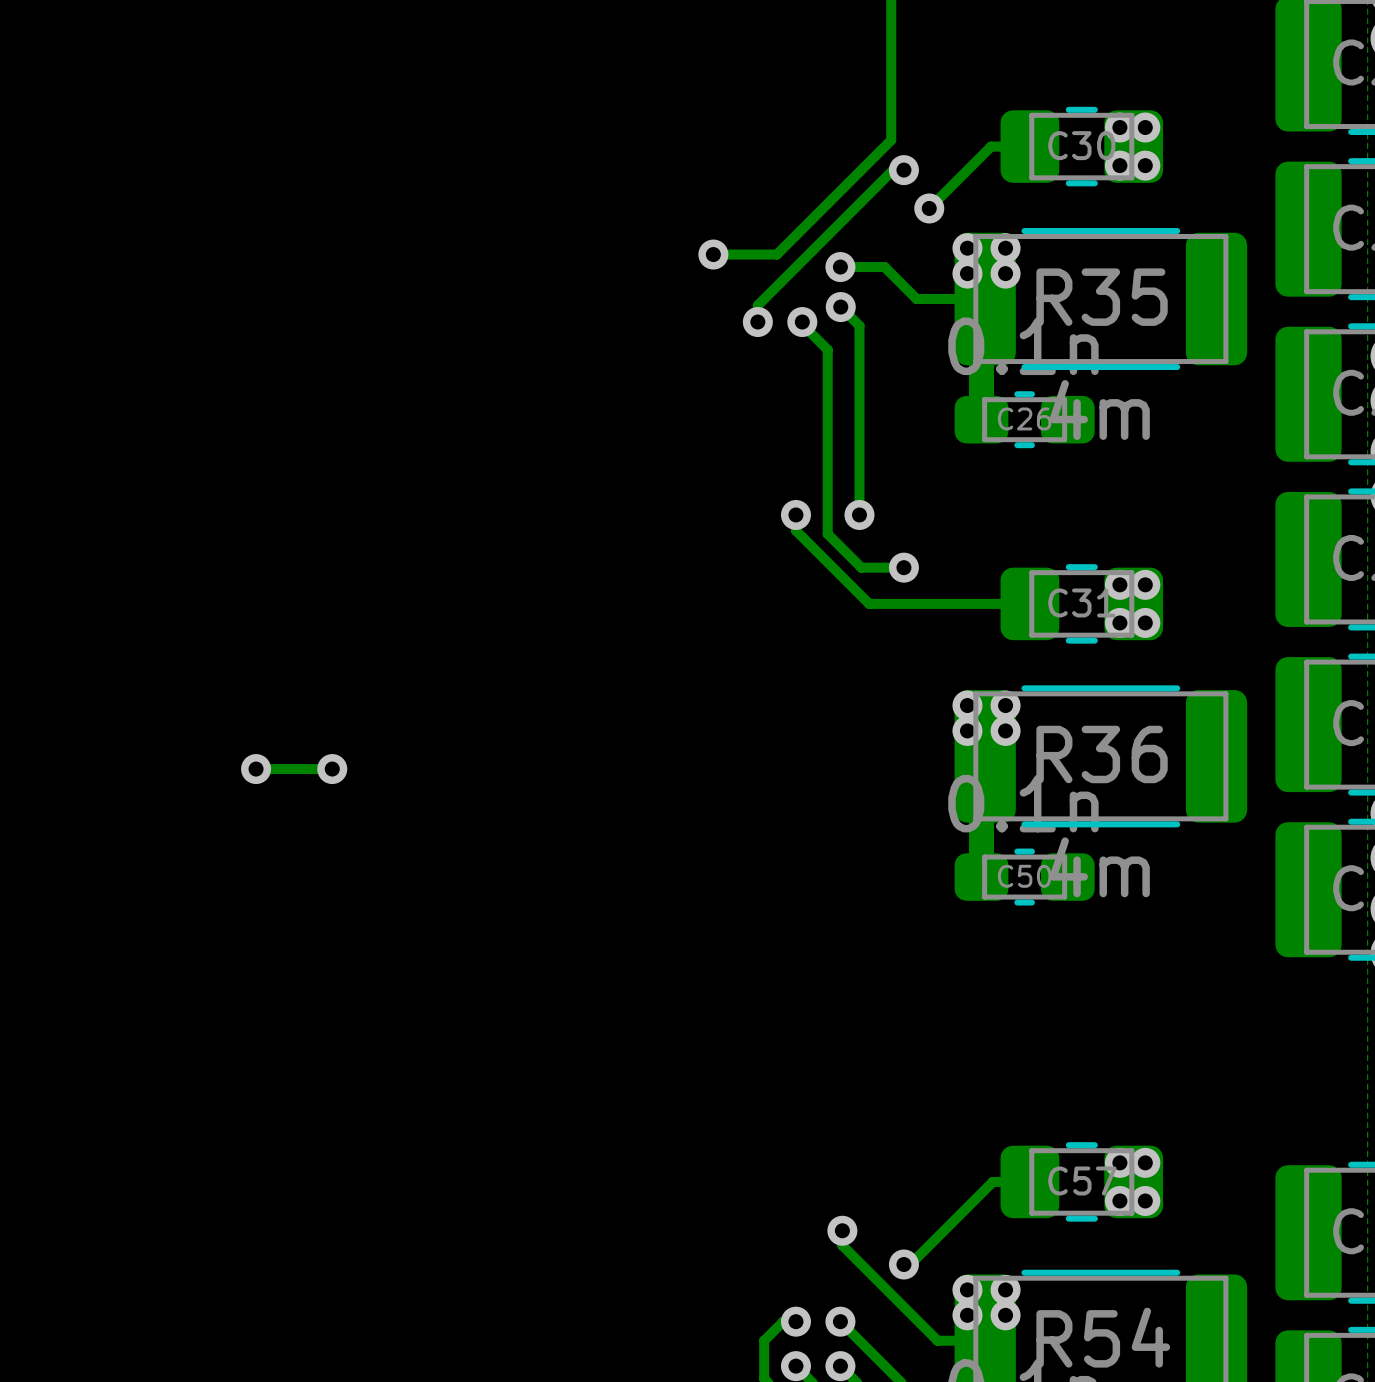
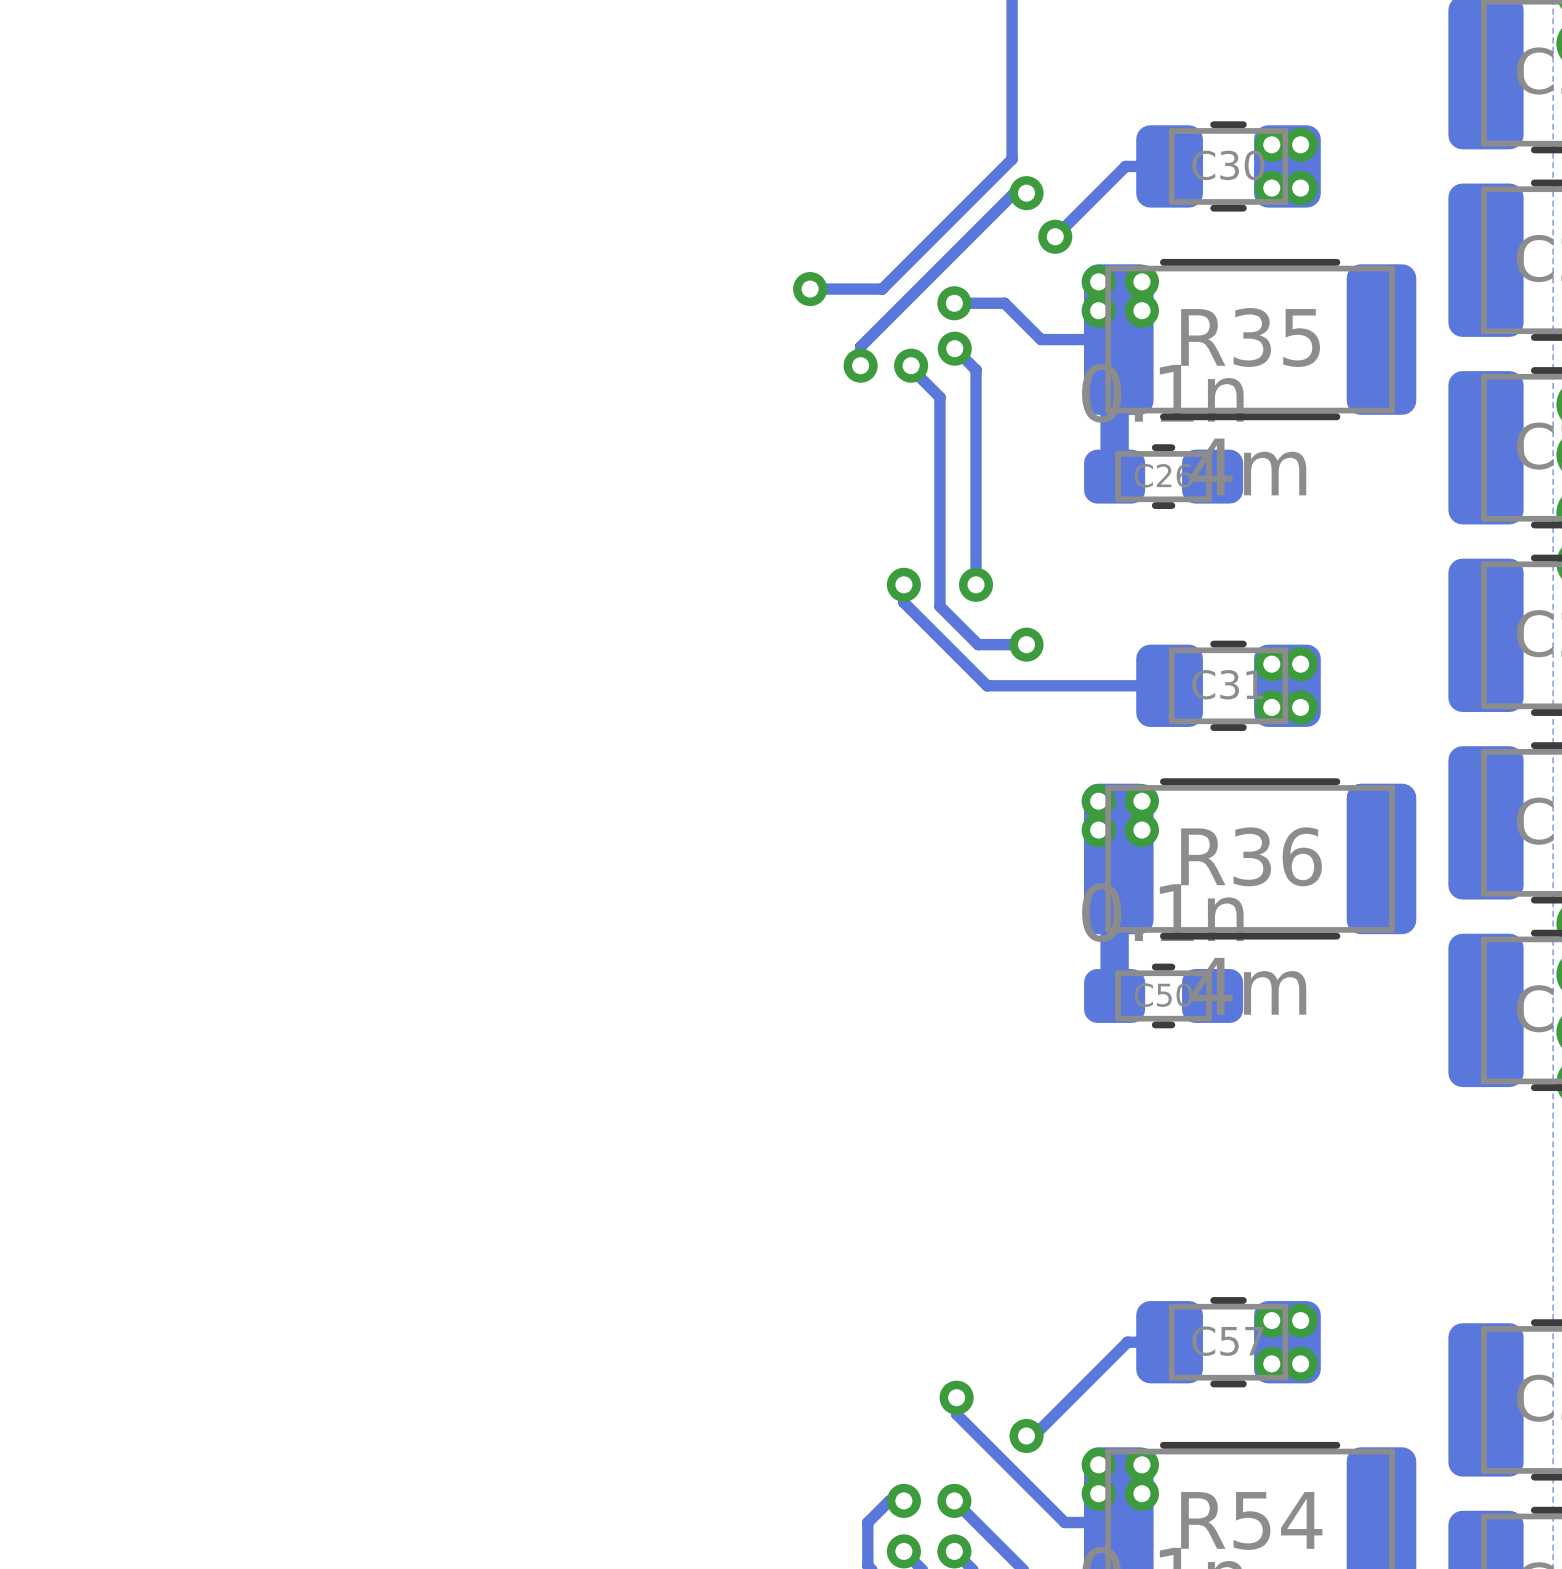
via: (256, 769) -> none
track: (332, 769) (256, 769) -> none
via: (332, 769) -> none

